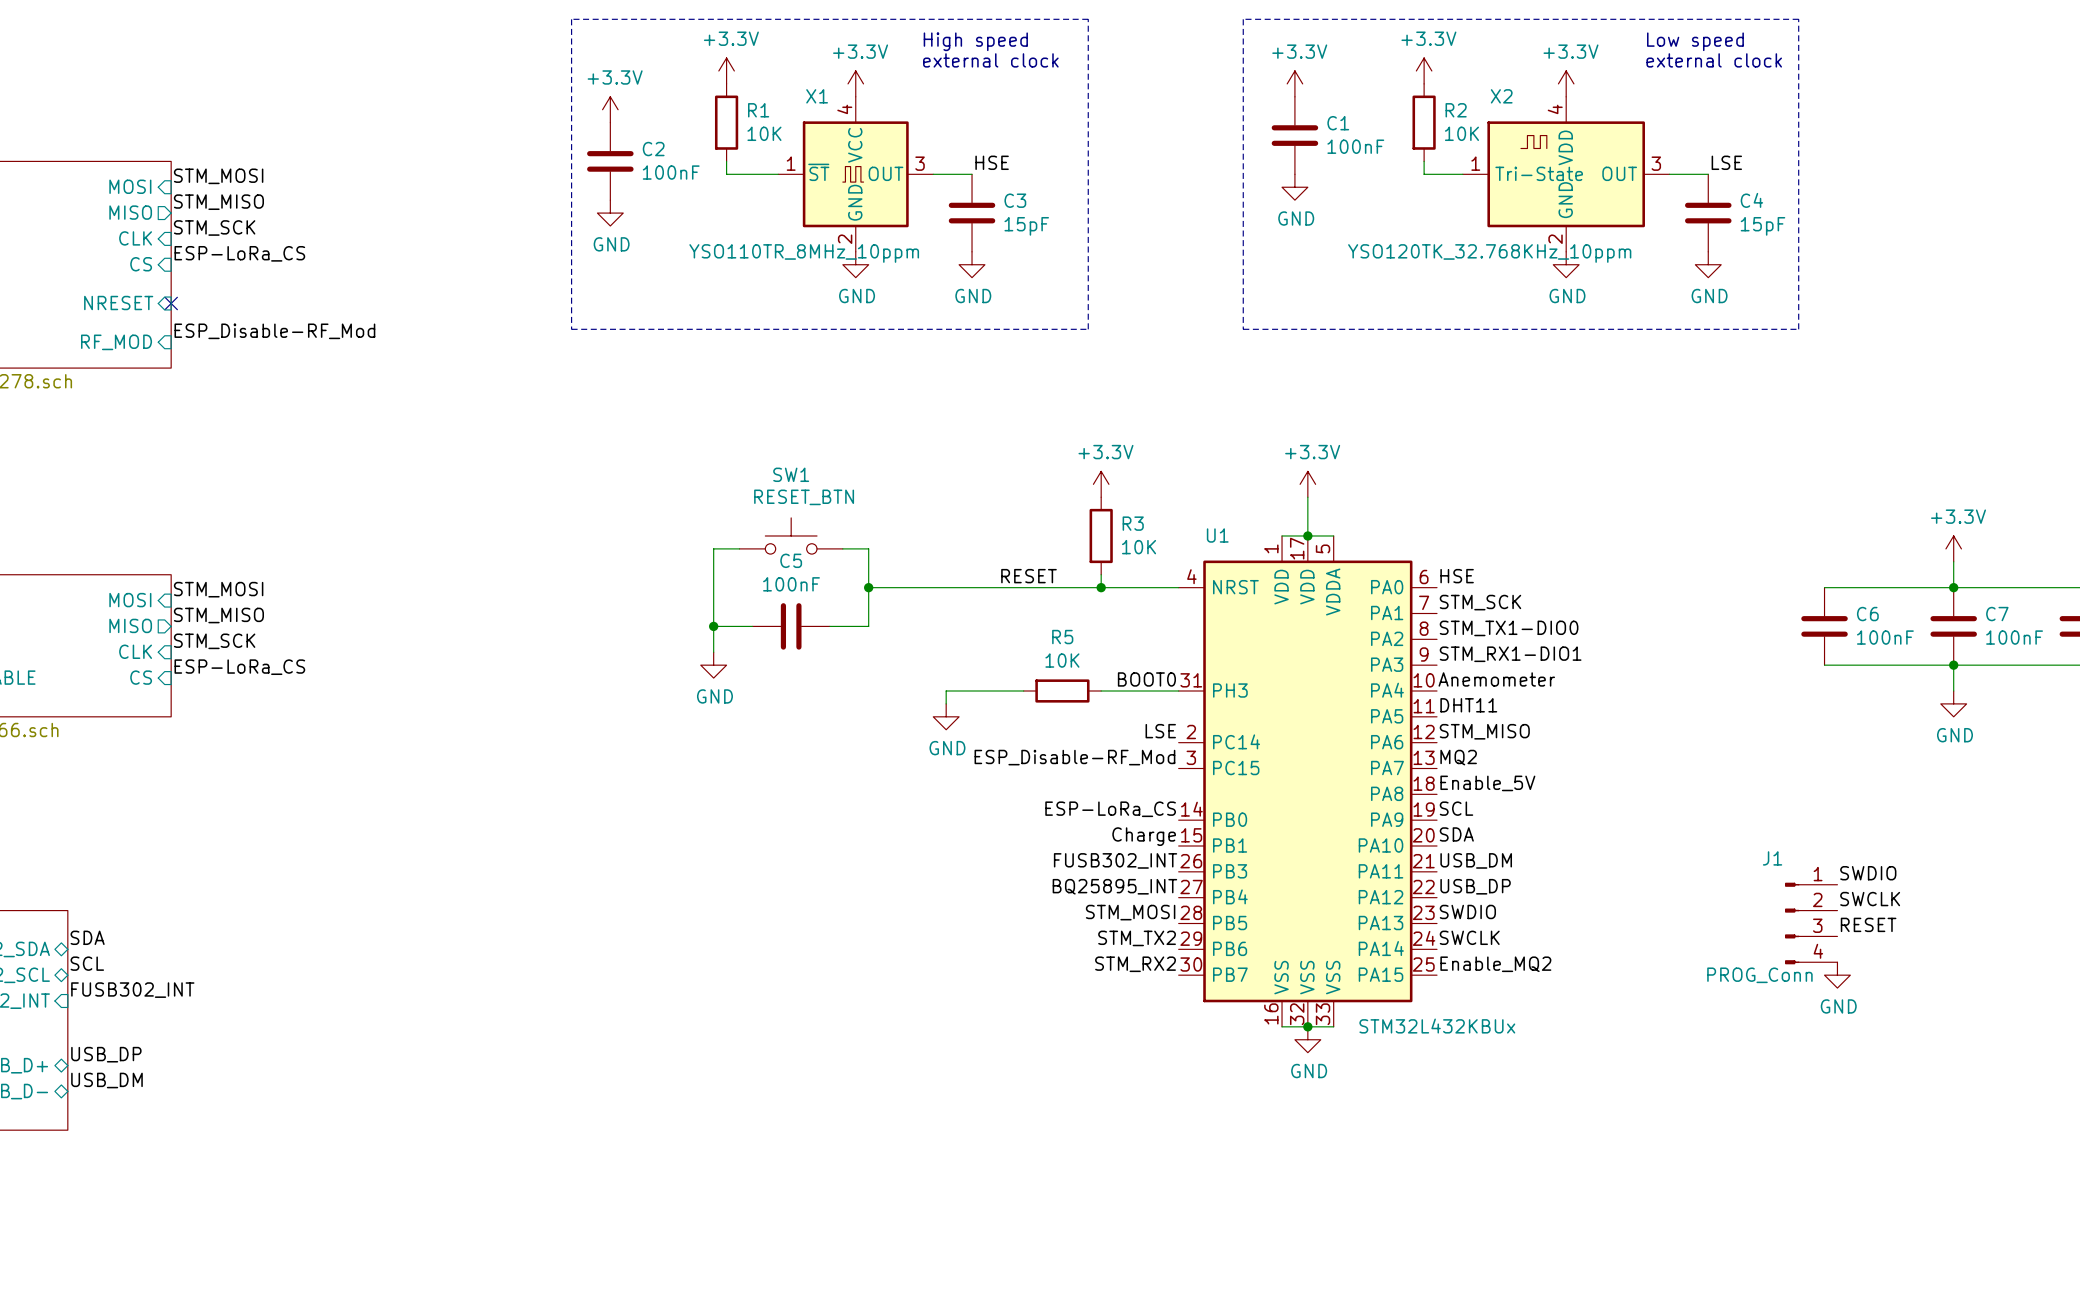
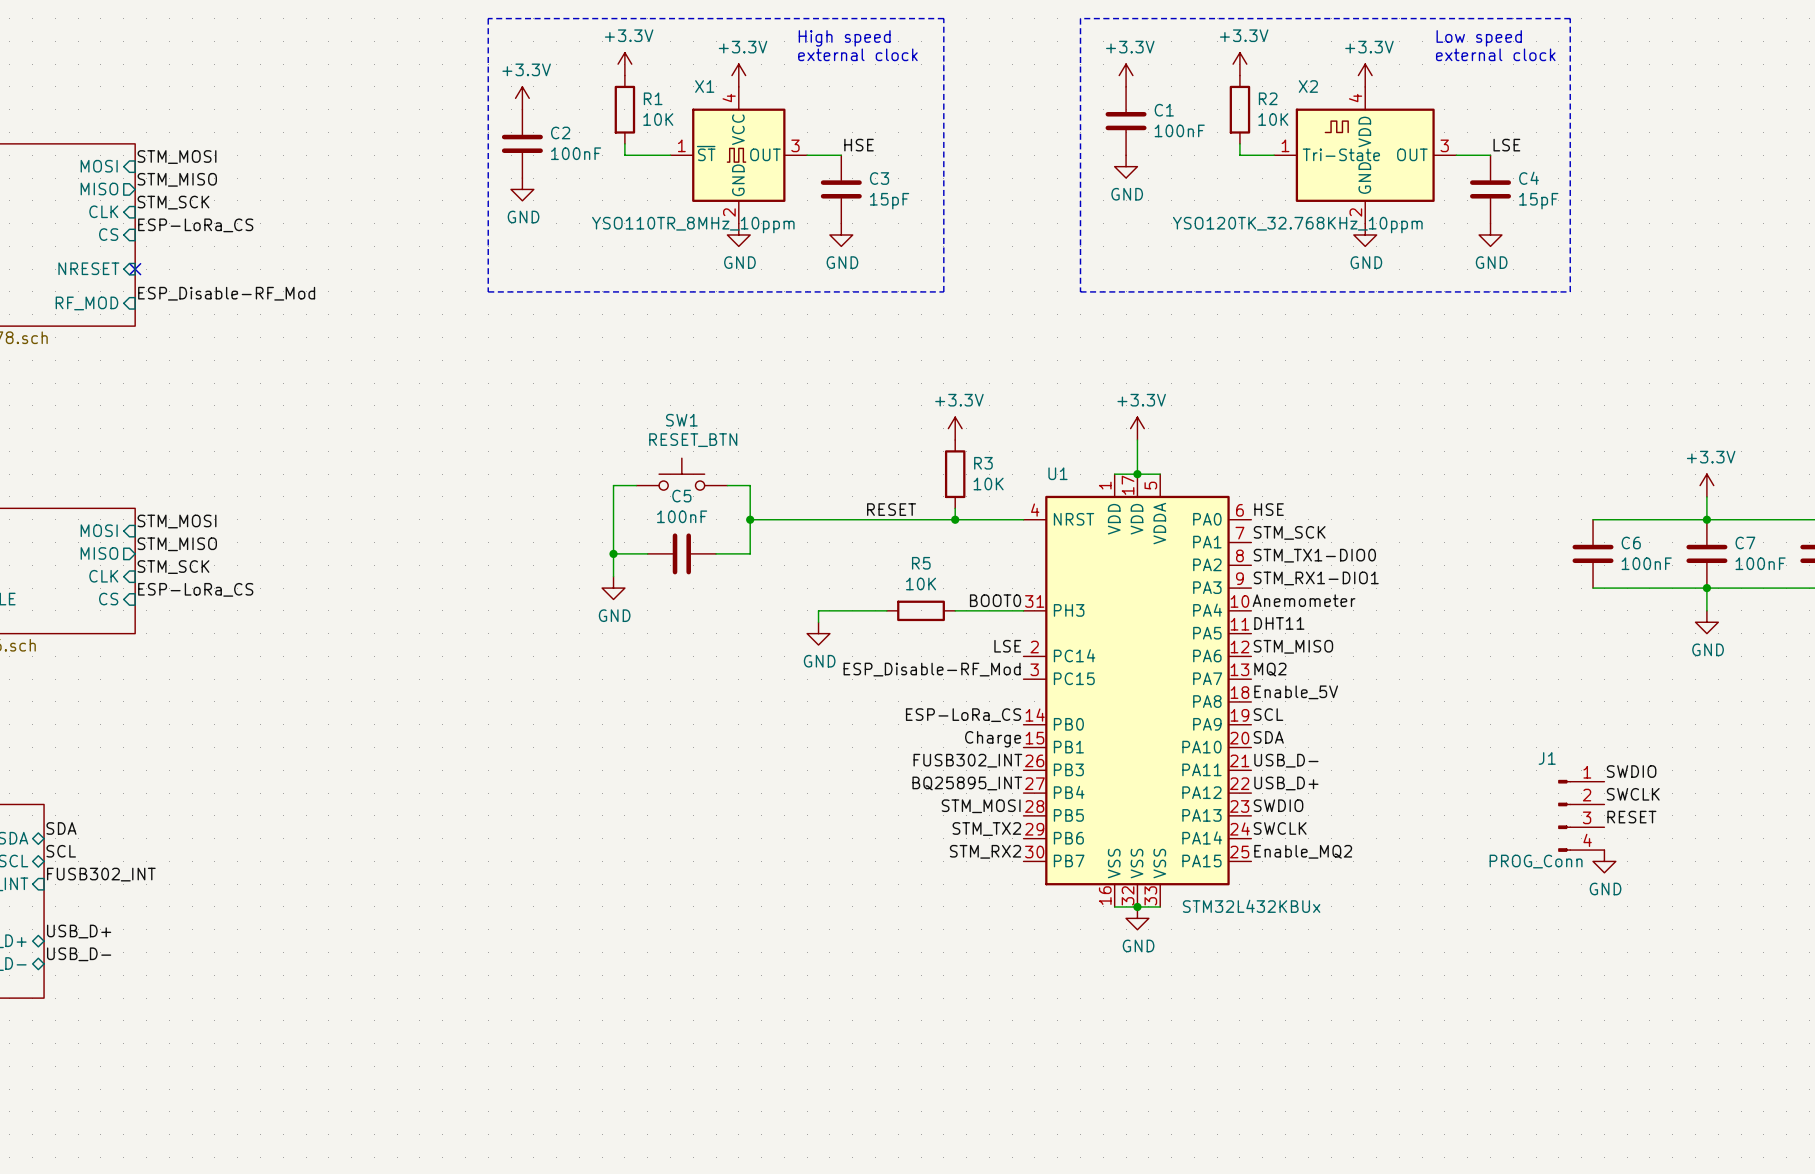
label: USB_DM (1476, 860) -> USB_D- (1286, 760)
label: USB_DP (1475, 886) -> USB_D+ (1286, 783)
label: USB_DP (106, 1054) -> USB_D+ (79, 931)
label: USB_DM (106, 1080) -> USB_D- (79, 954)

